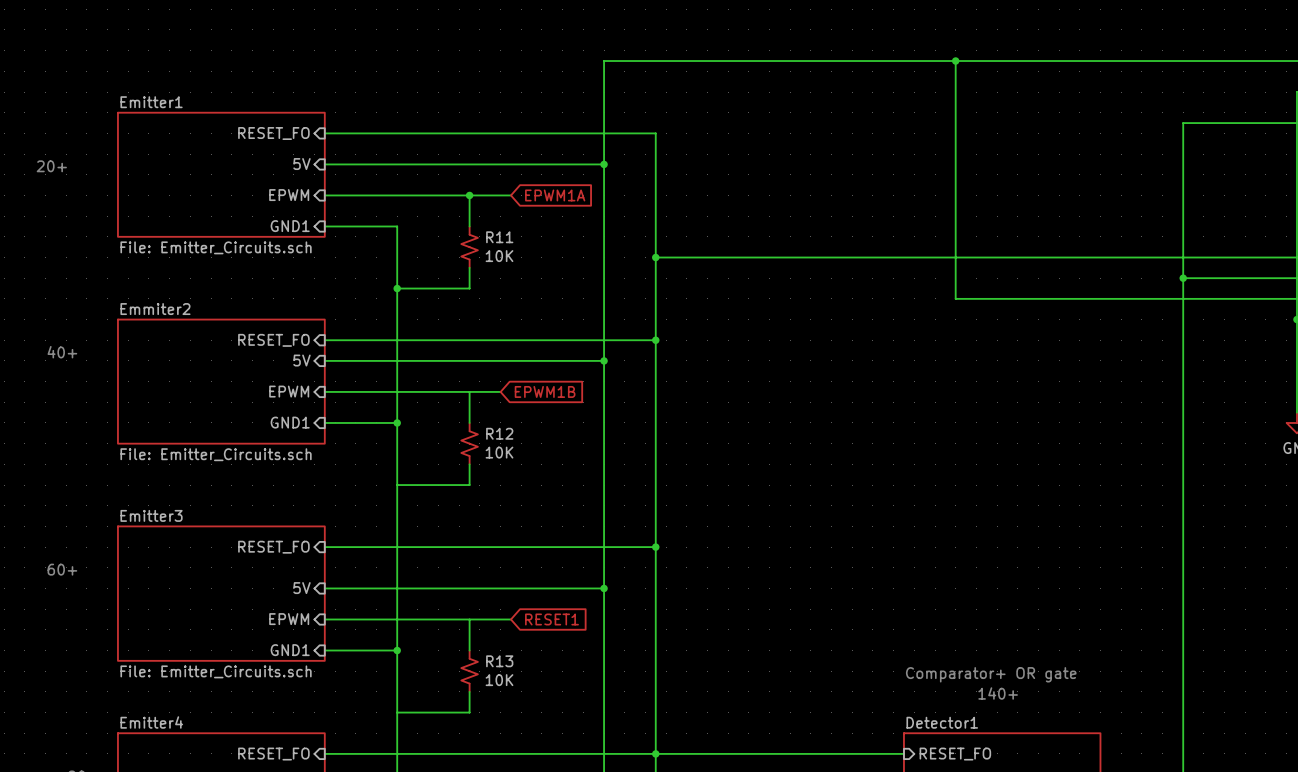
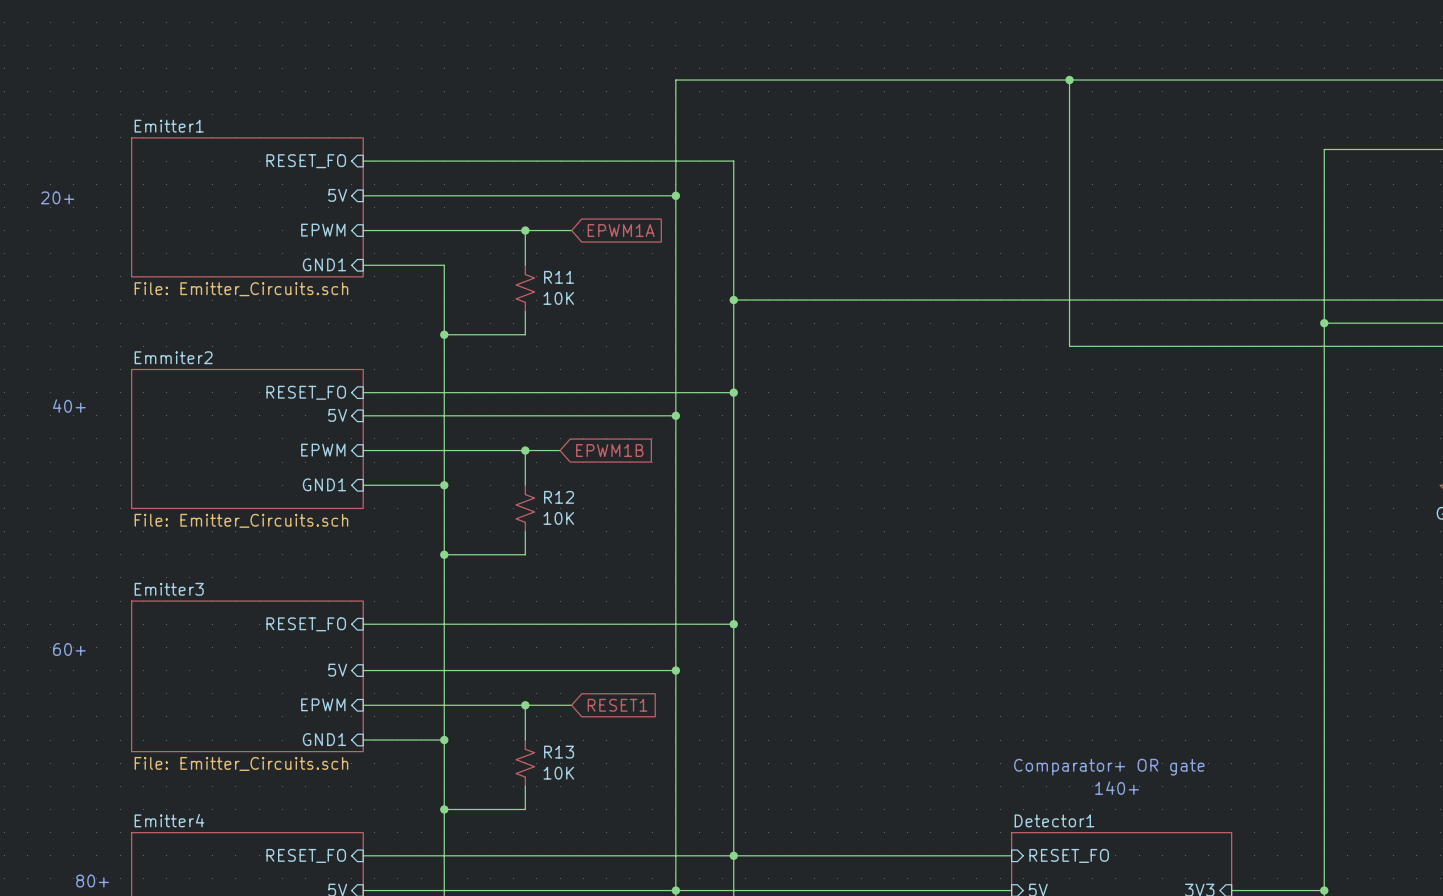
junction: none -> (525, 450)
junction: none -> (444, 554)
junction: none -> (525, 705)
junction: none -> (444, 809)

